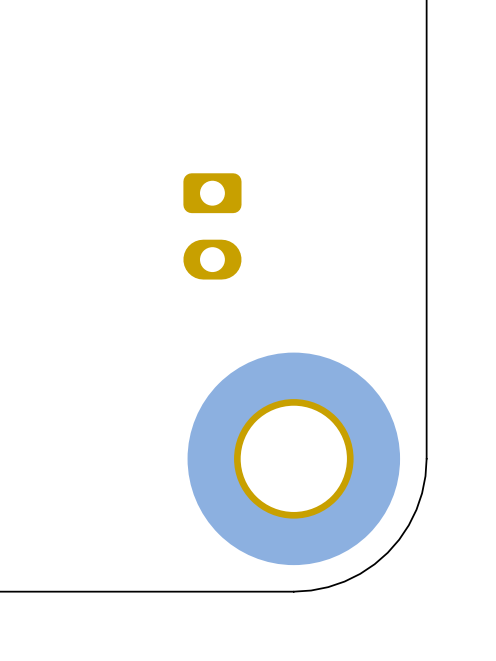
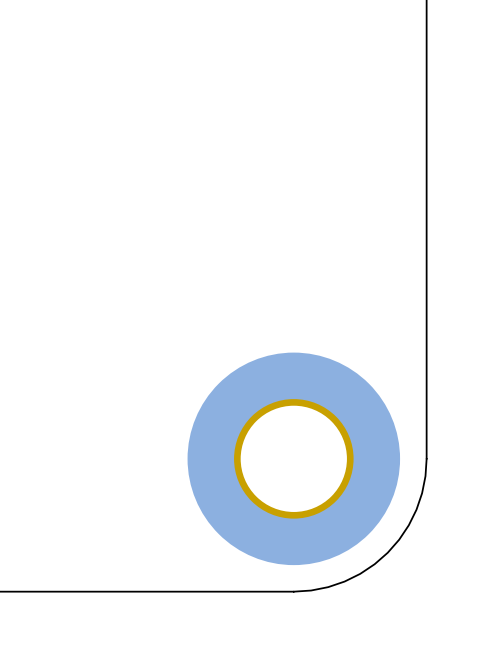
part: (212, 226) -> none

